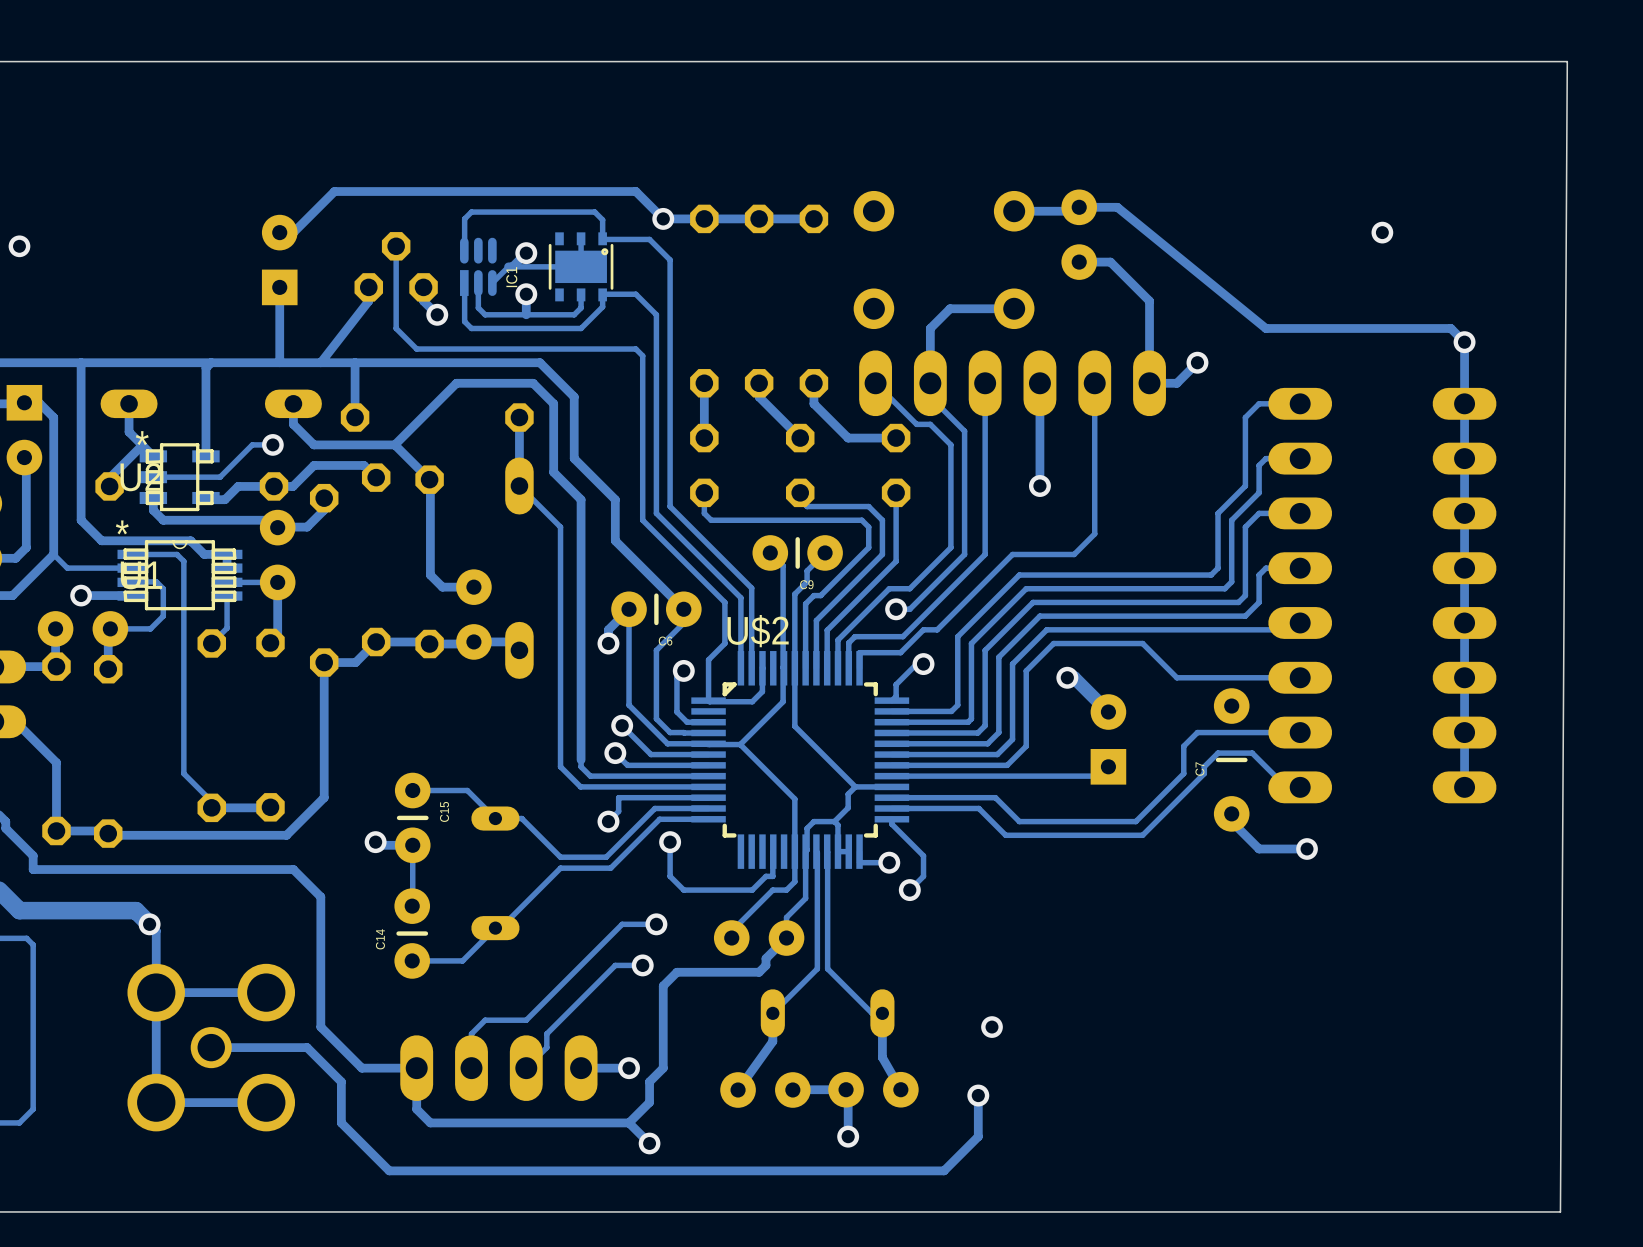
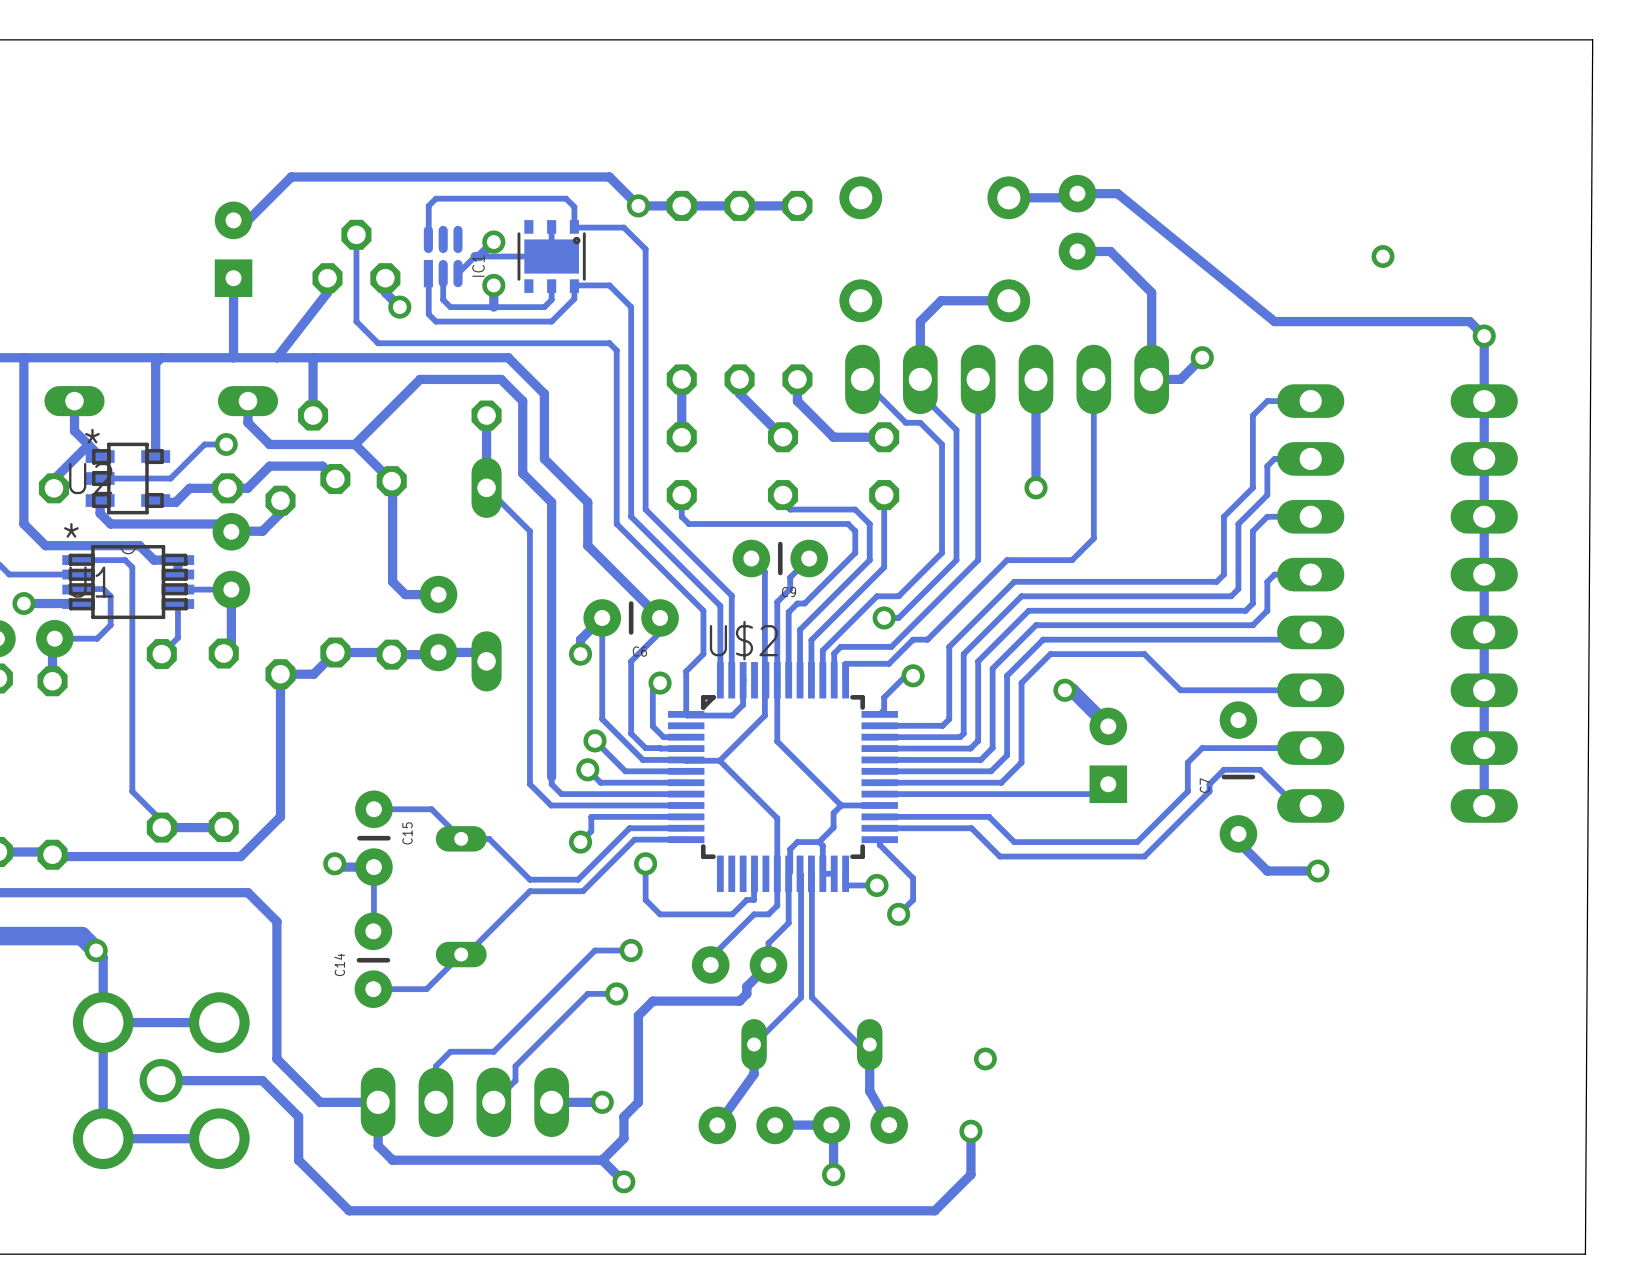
via position: (1382, 232) -> (1383, 256)

